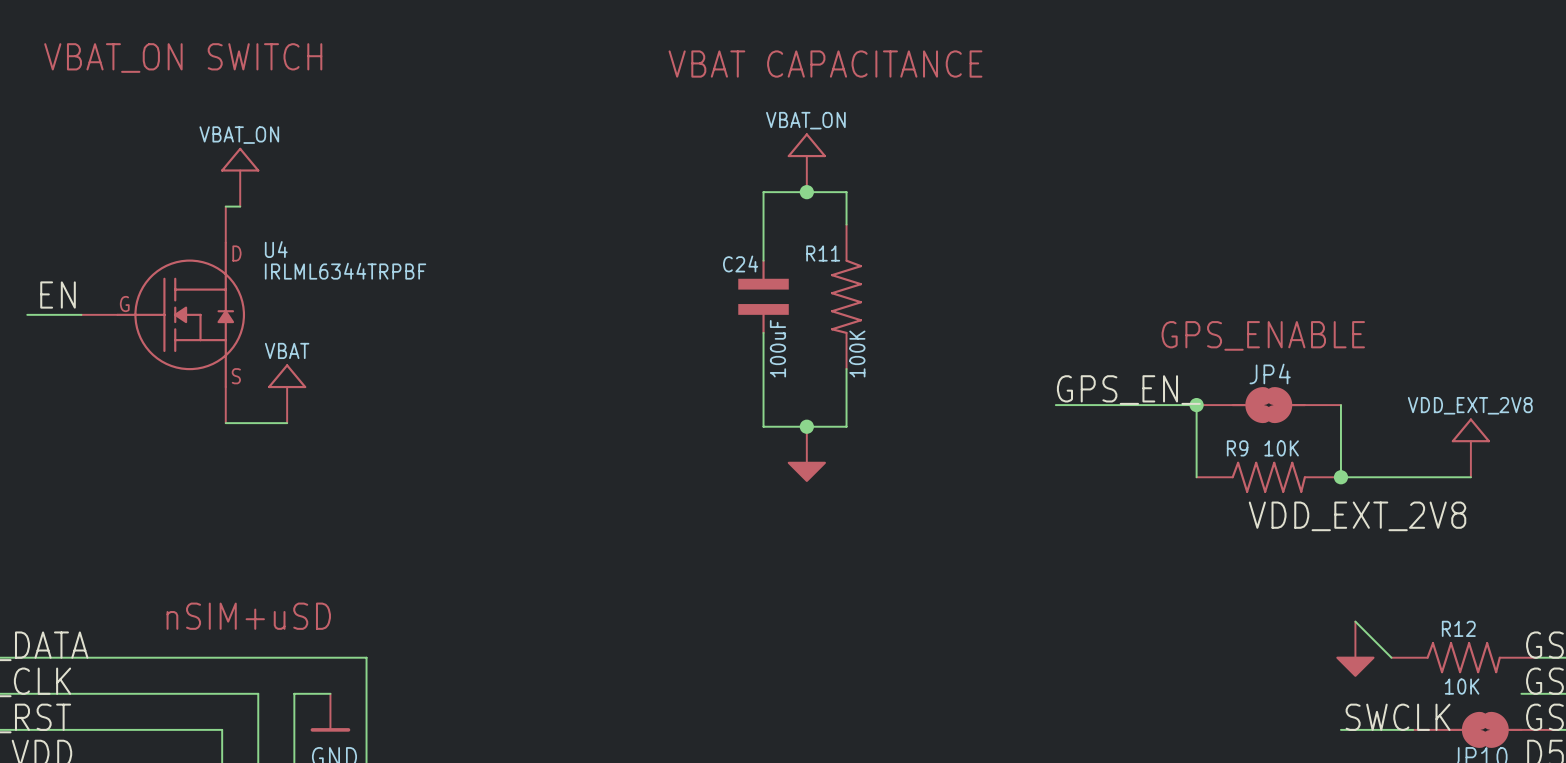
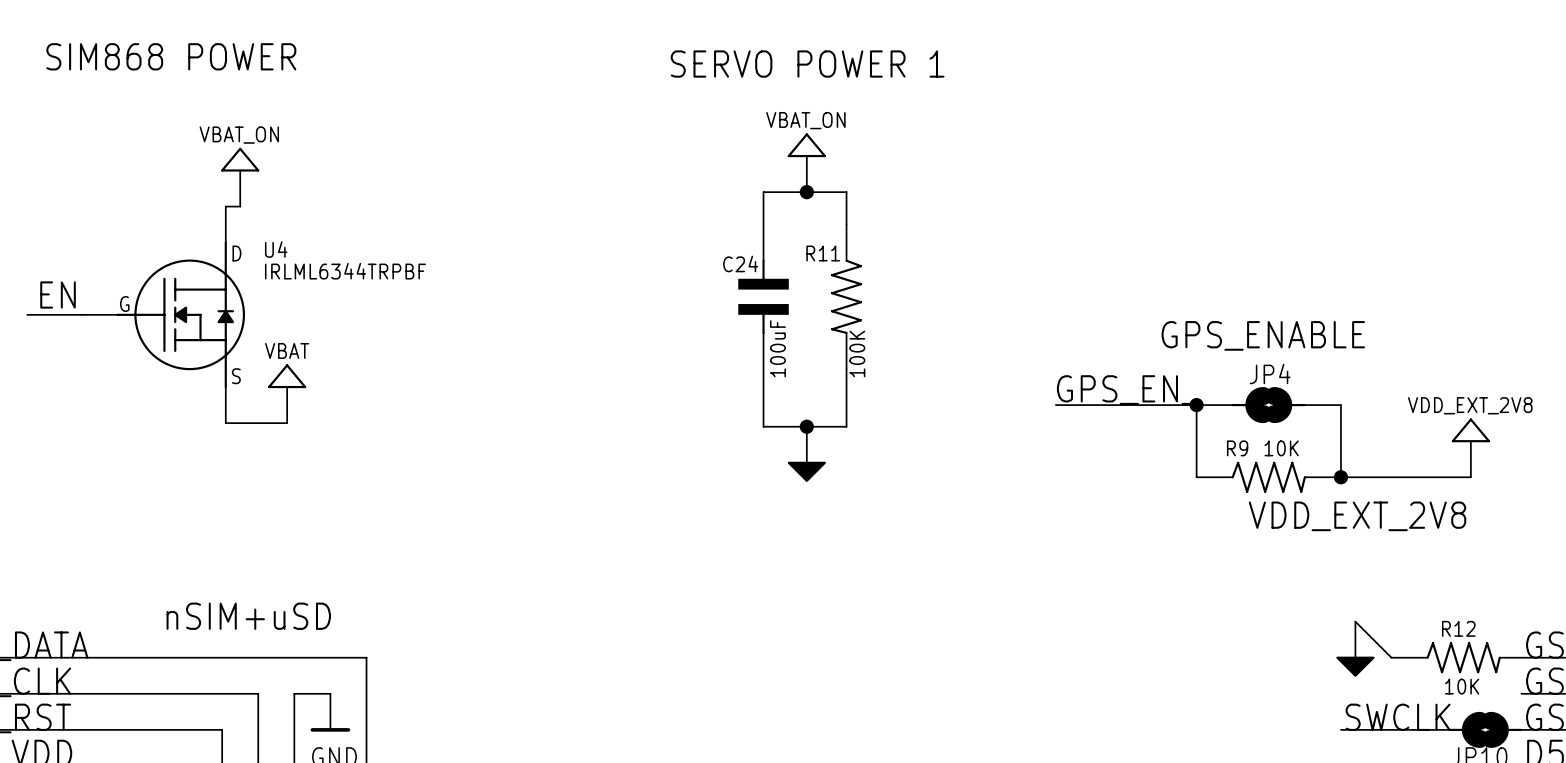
text: VBAT_ON SWITCH (183, 58) -> SIM868 POWER (171, 56)
text: VBAT CAPACITANCE (825, 64) -> SERVO POWER 1 (807, 64)

